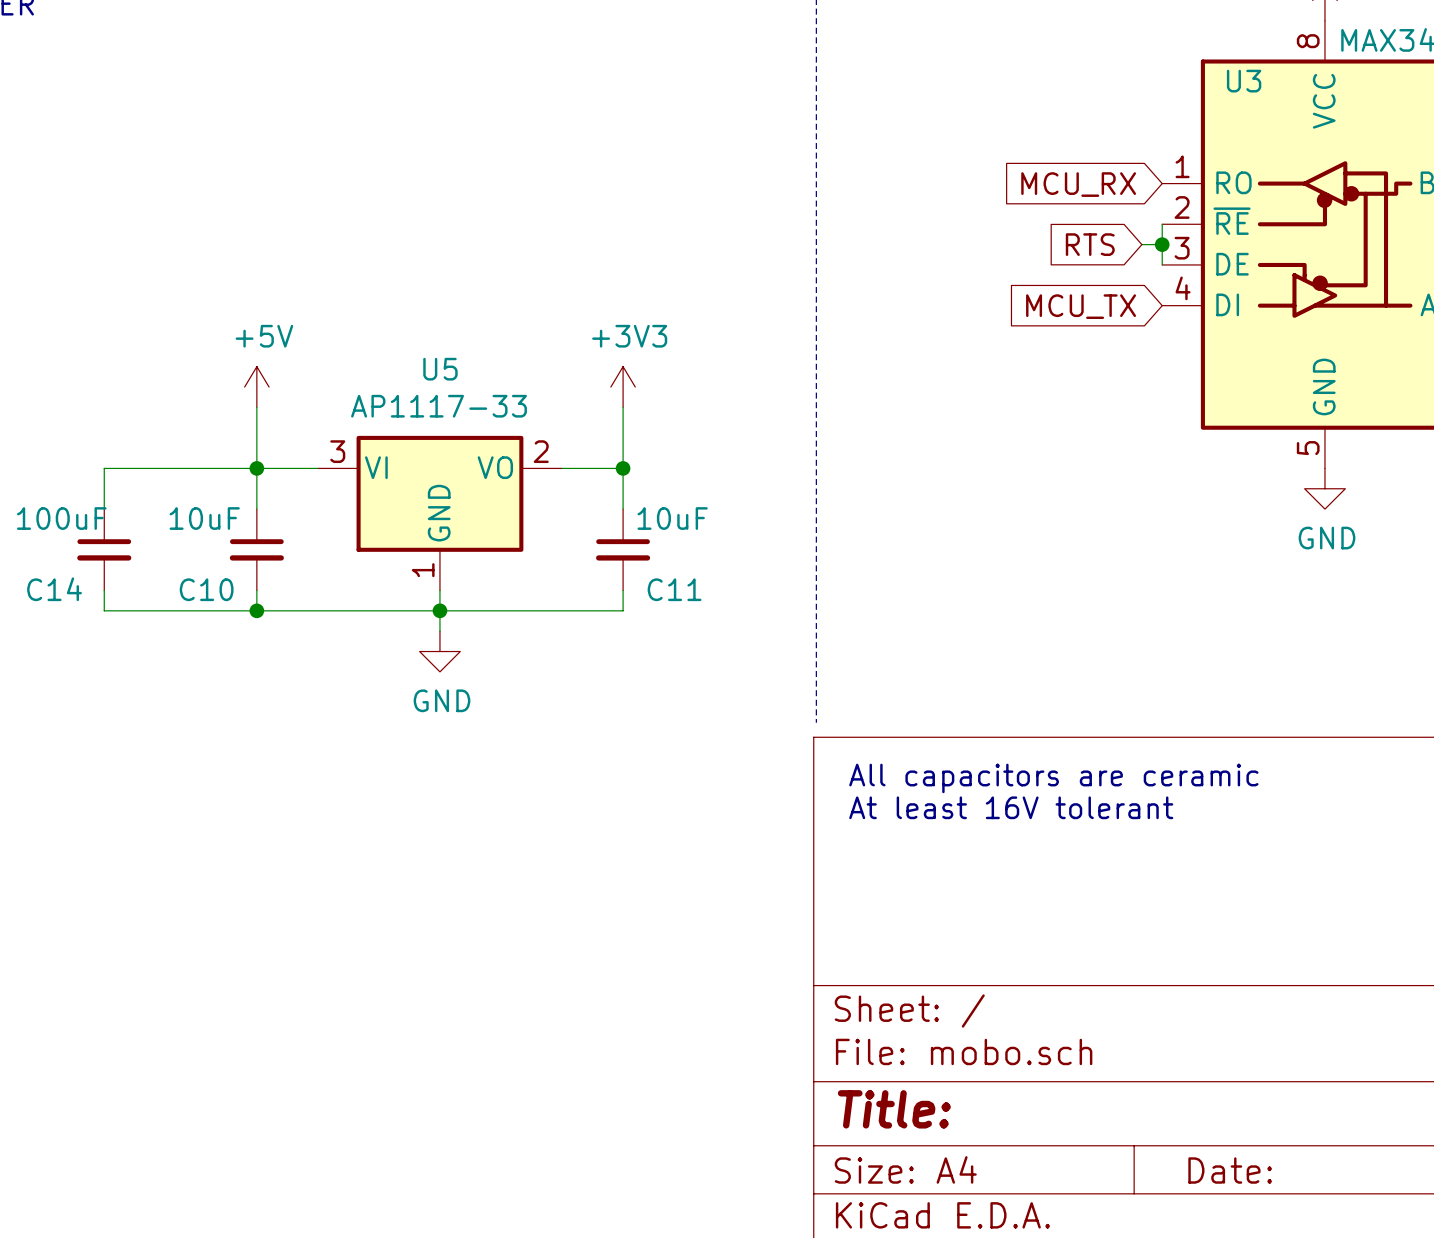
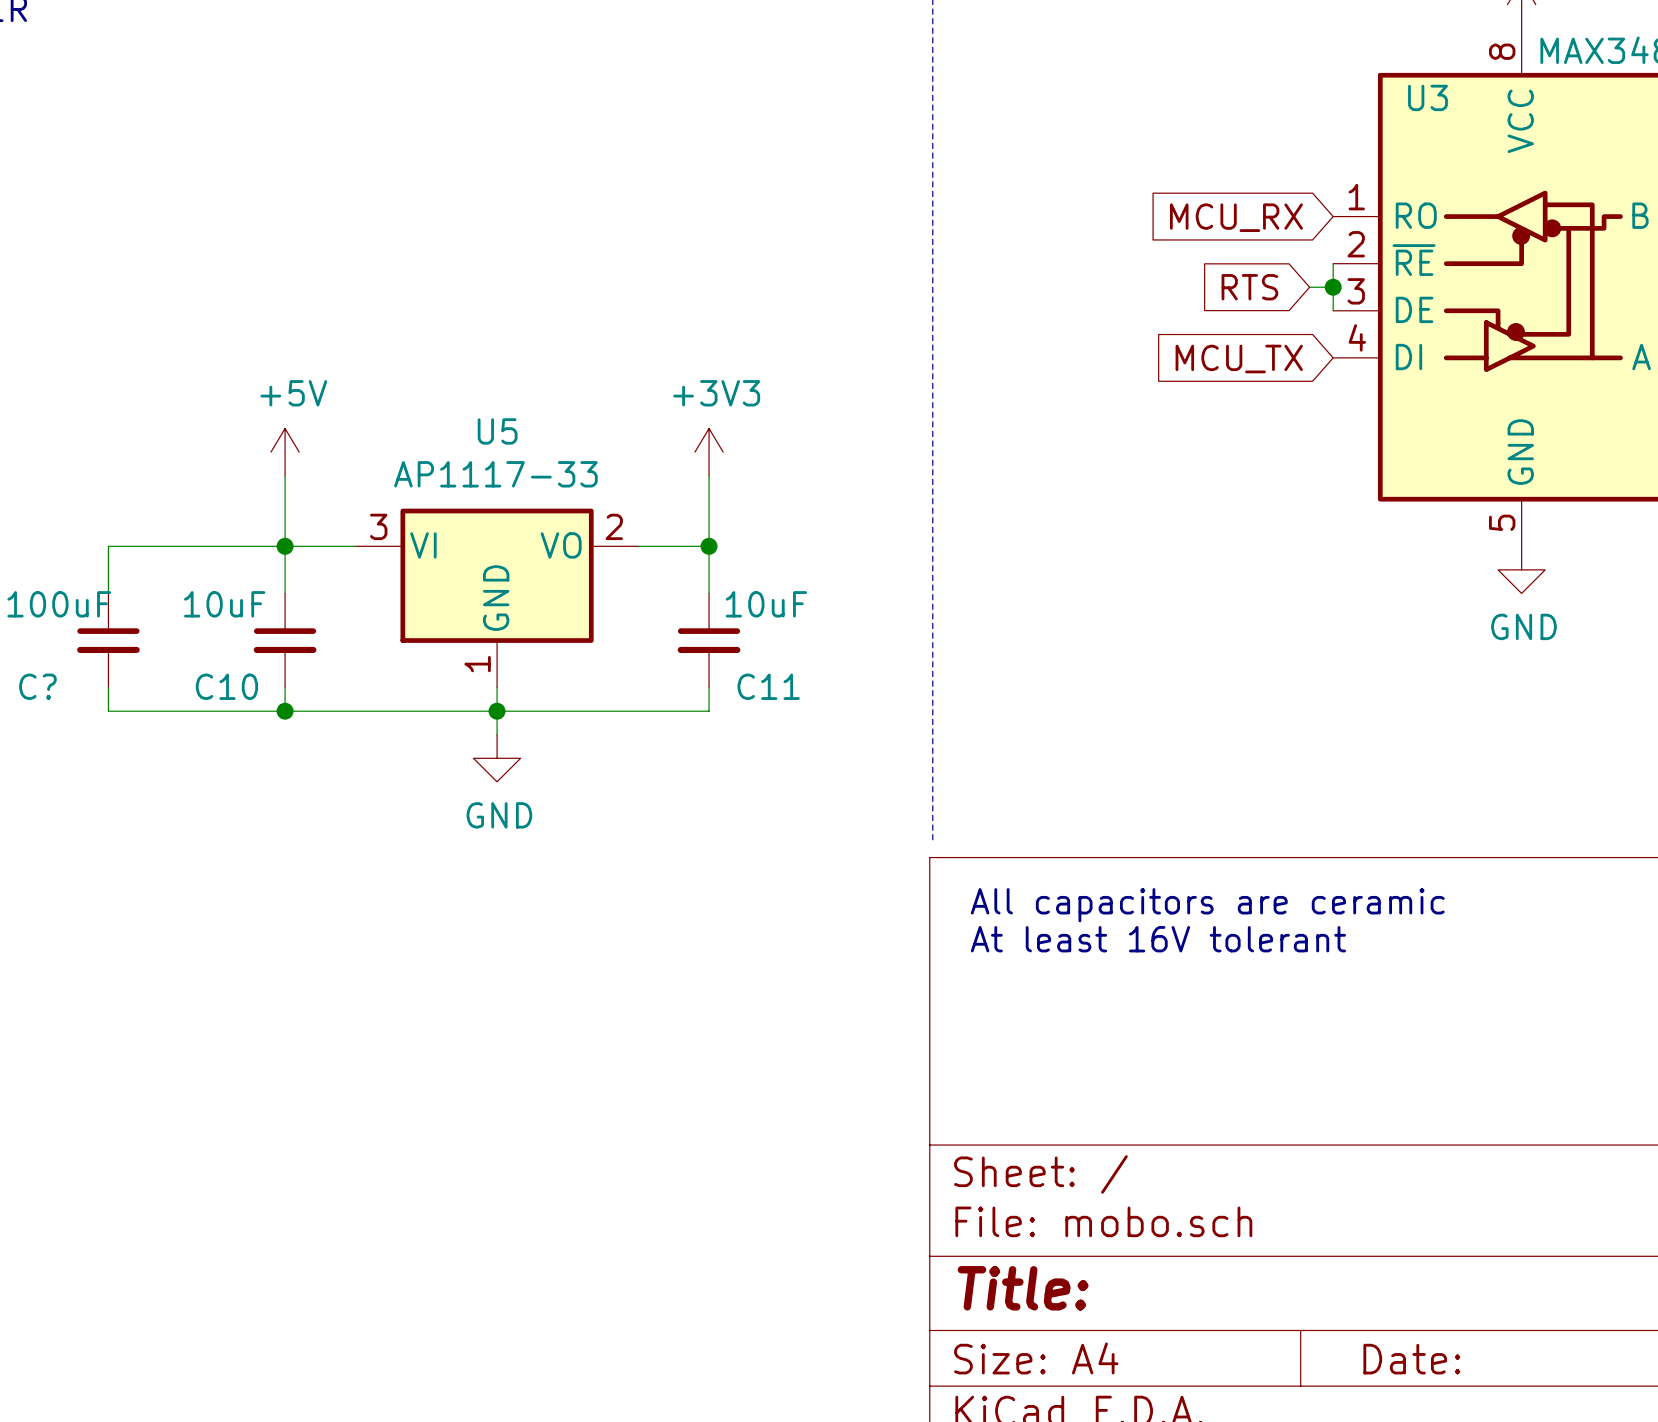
C14 name: C14 (54, 589) -> C? (37, 686)

